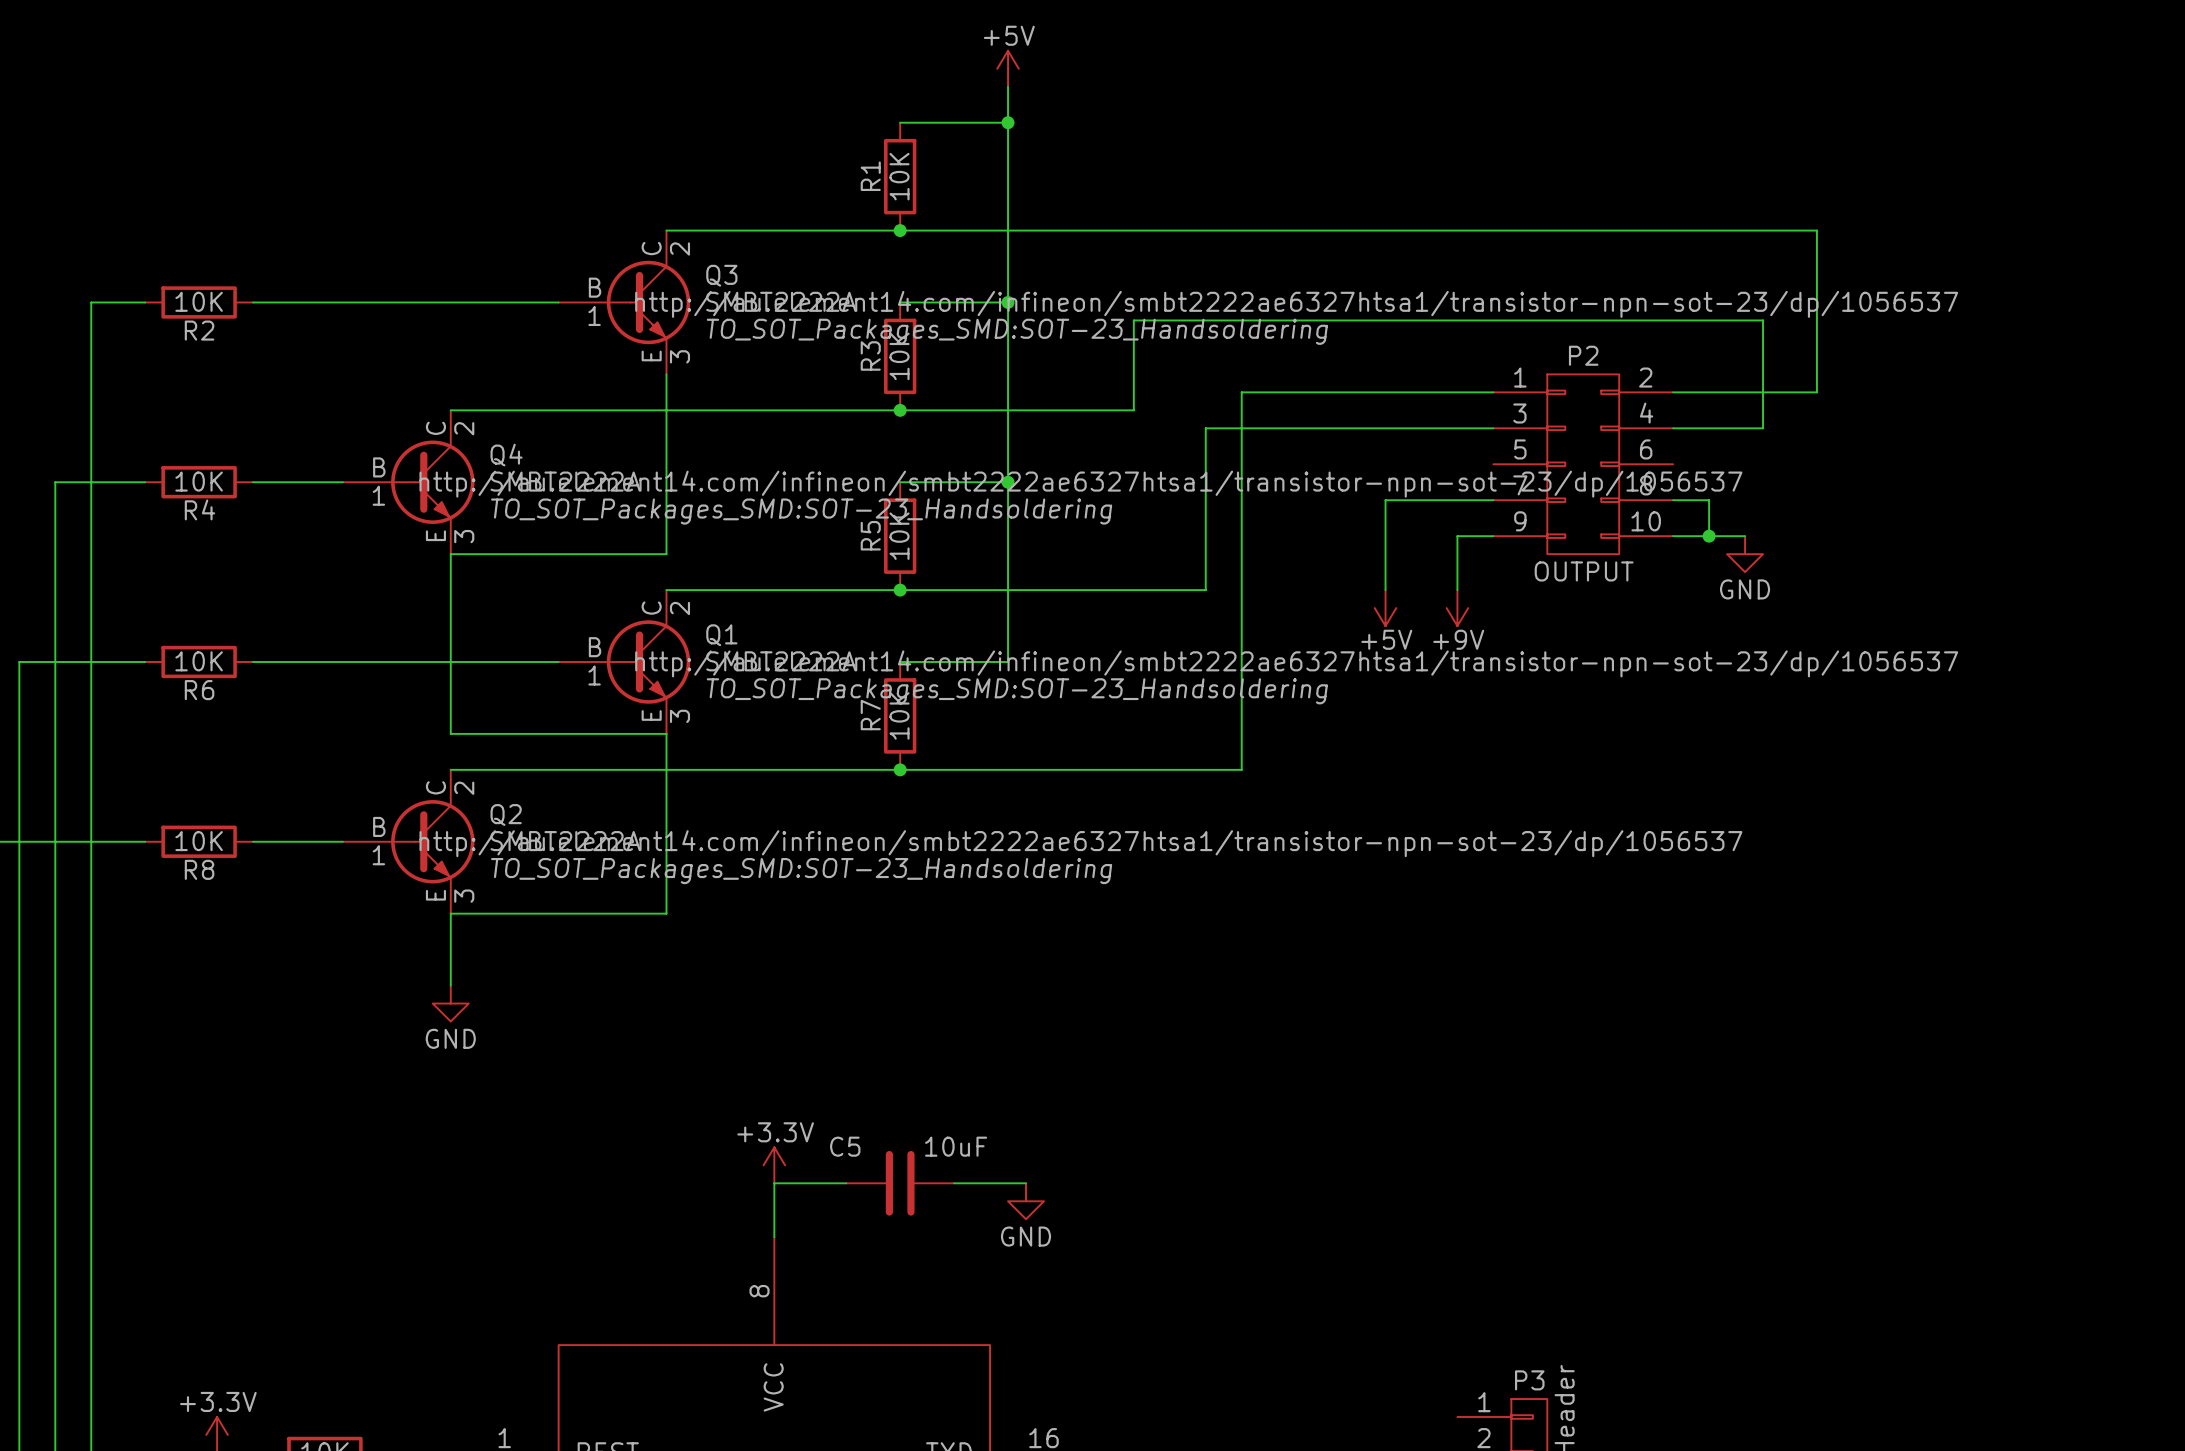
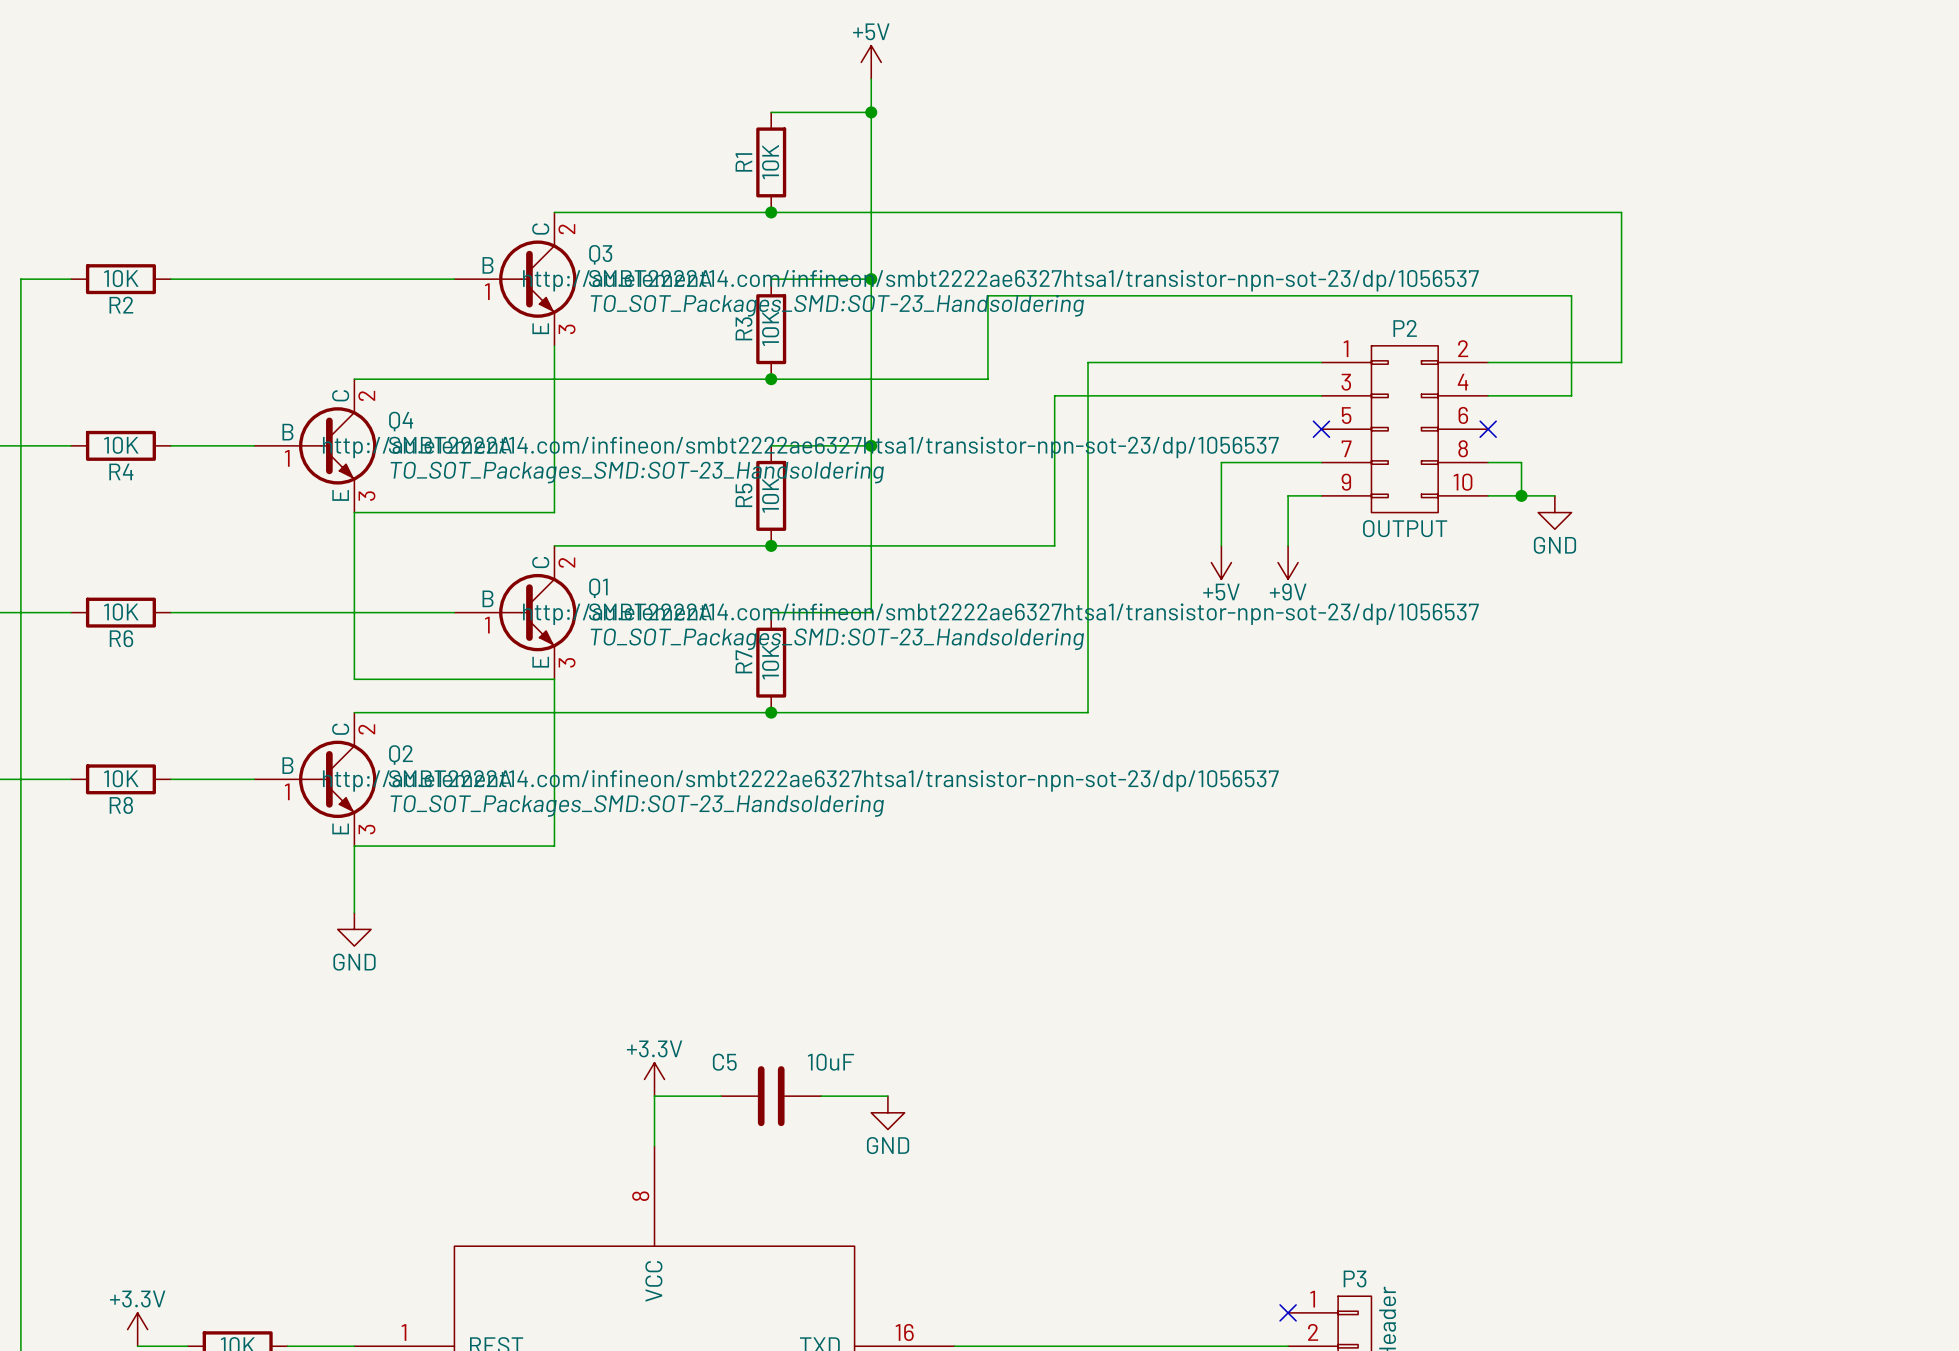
no-connect mark: none -> (1321, 429)
no-connect mark: none -> (1488, 429)
no-connect mark: none -> (1288, 1312)

